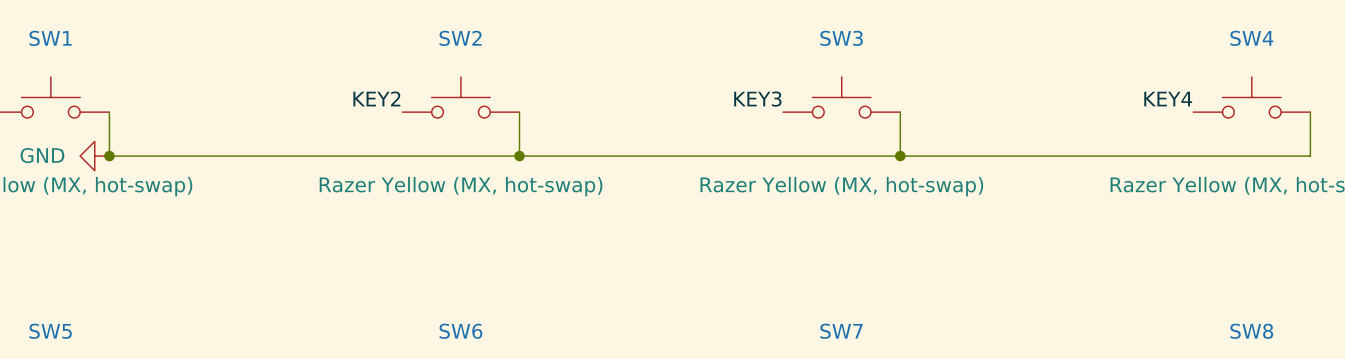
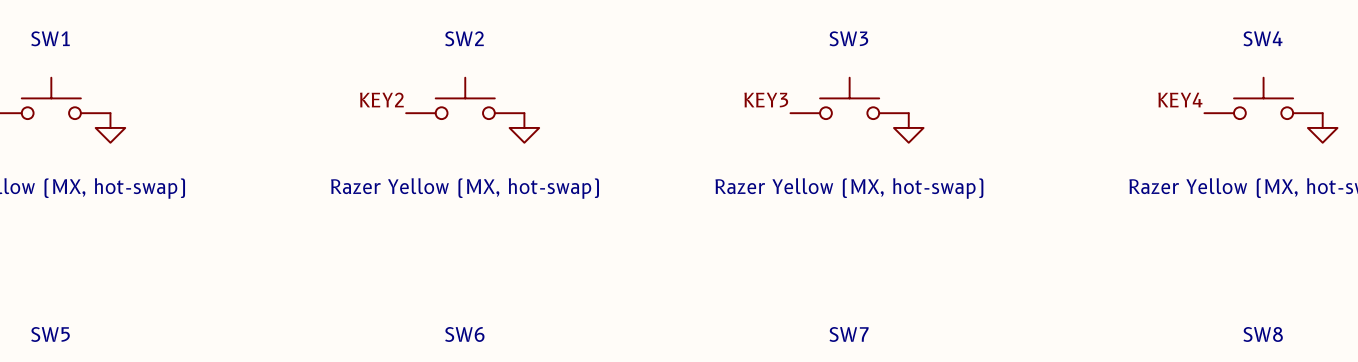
wire: (109, 112) (109, 156) (1310, 156) (1310, 112) -> none
wire: (519, 112) (519, 156) -> none
wire: (900, 112) (900, 156) -> none
power symbol: none -> (110, 127)
power symbol: none -> (524, 127)
power symbol: none -> (908, 127)
power symbol: none -> (1322, 127)
power symbol: GND (94, 156) -> none
junction: (109, 156) -> none
junction: (519, 156) -> none
junction: (900, 156) -> none

